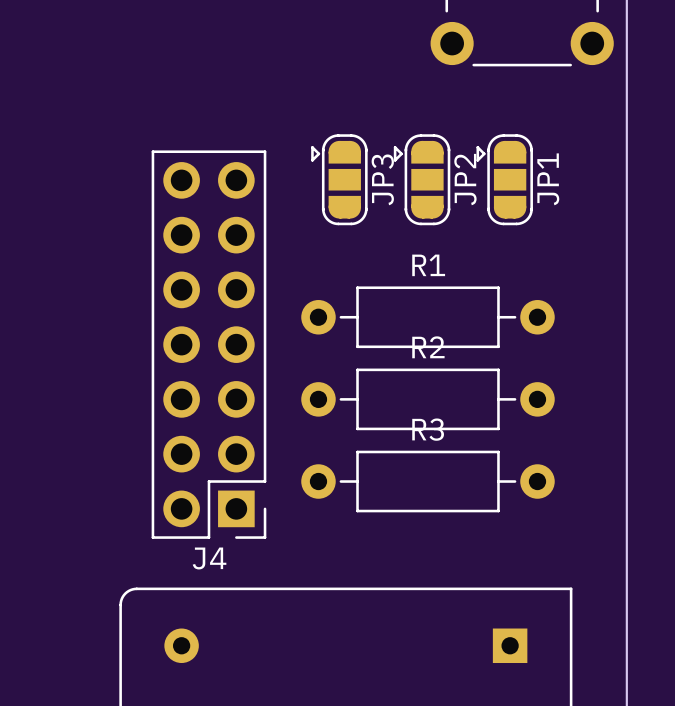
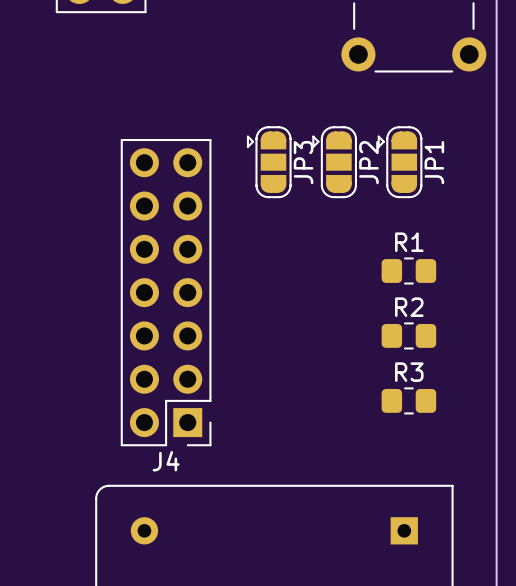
R1 footprint: [301, 286, 555, 349] -> [381, 257, 437, 285]
R2 footprint: [301, 368, 555, 431] -> [381, 322, 437, 350]
R3 footprint: [301, 450, 555, 513] -> [381, 387, 437, 415]

